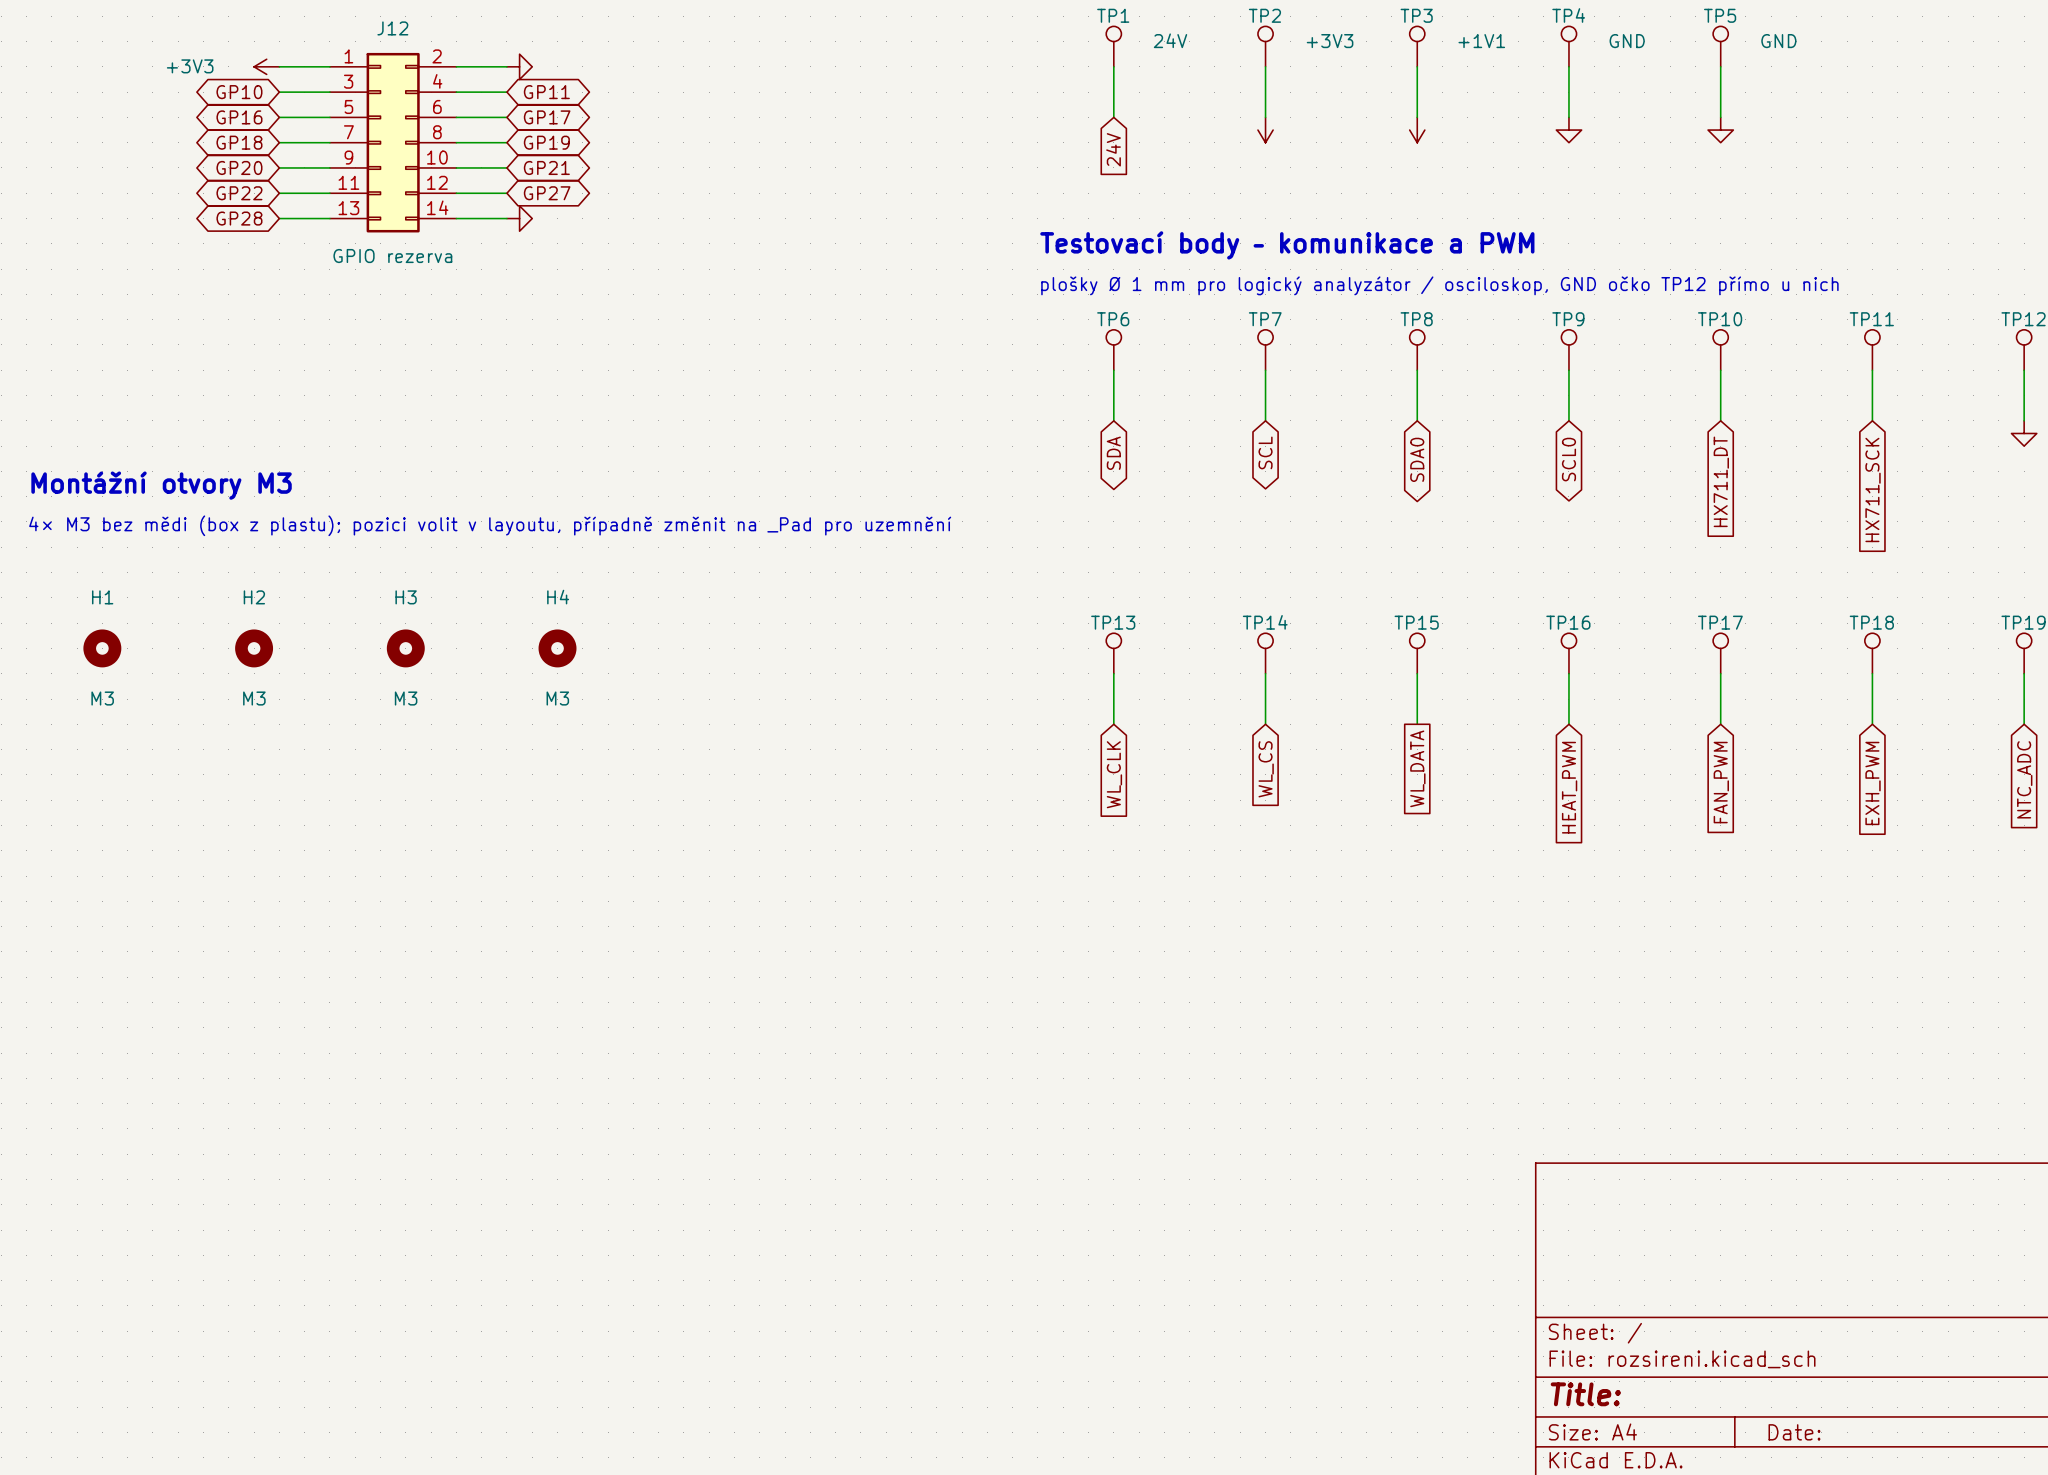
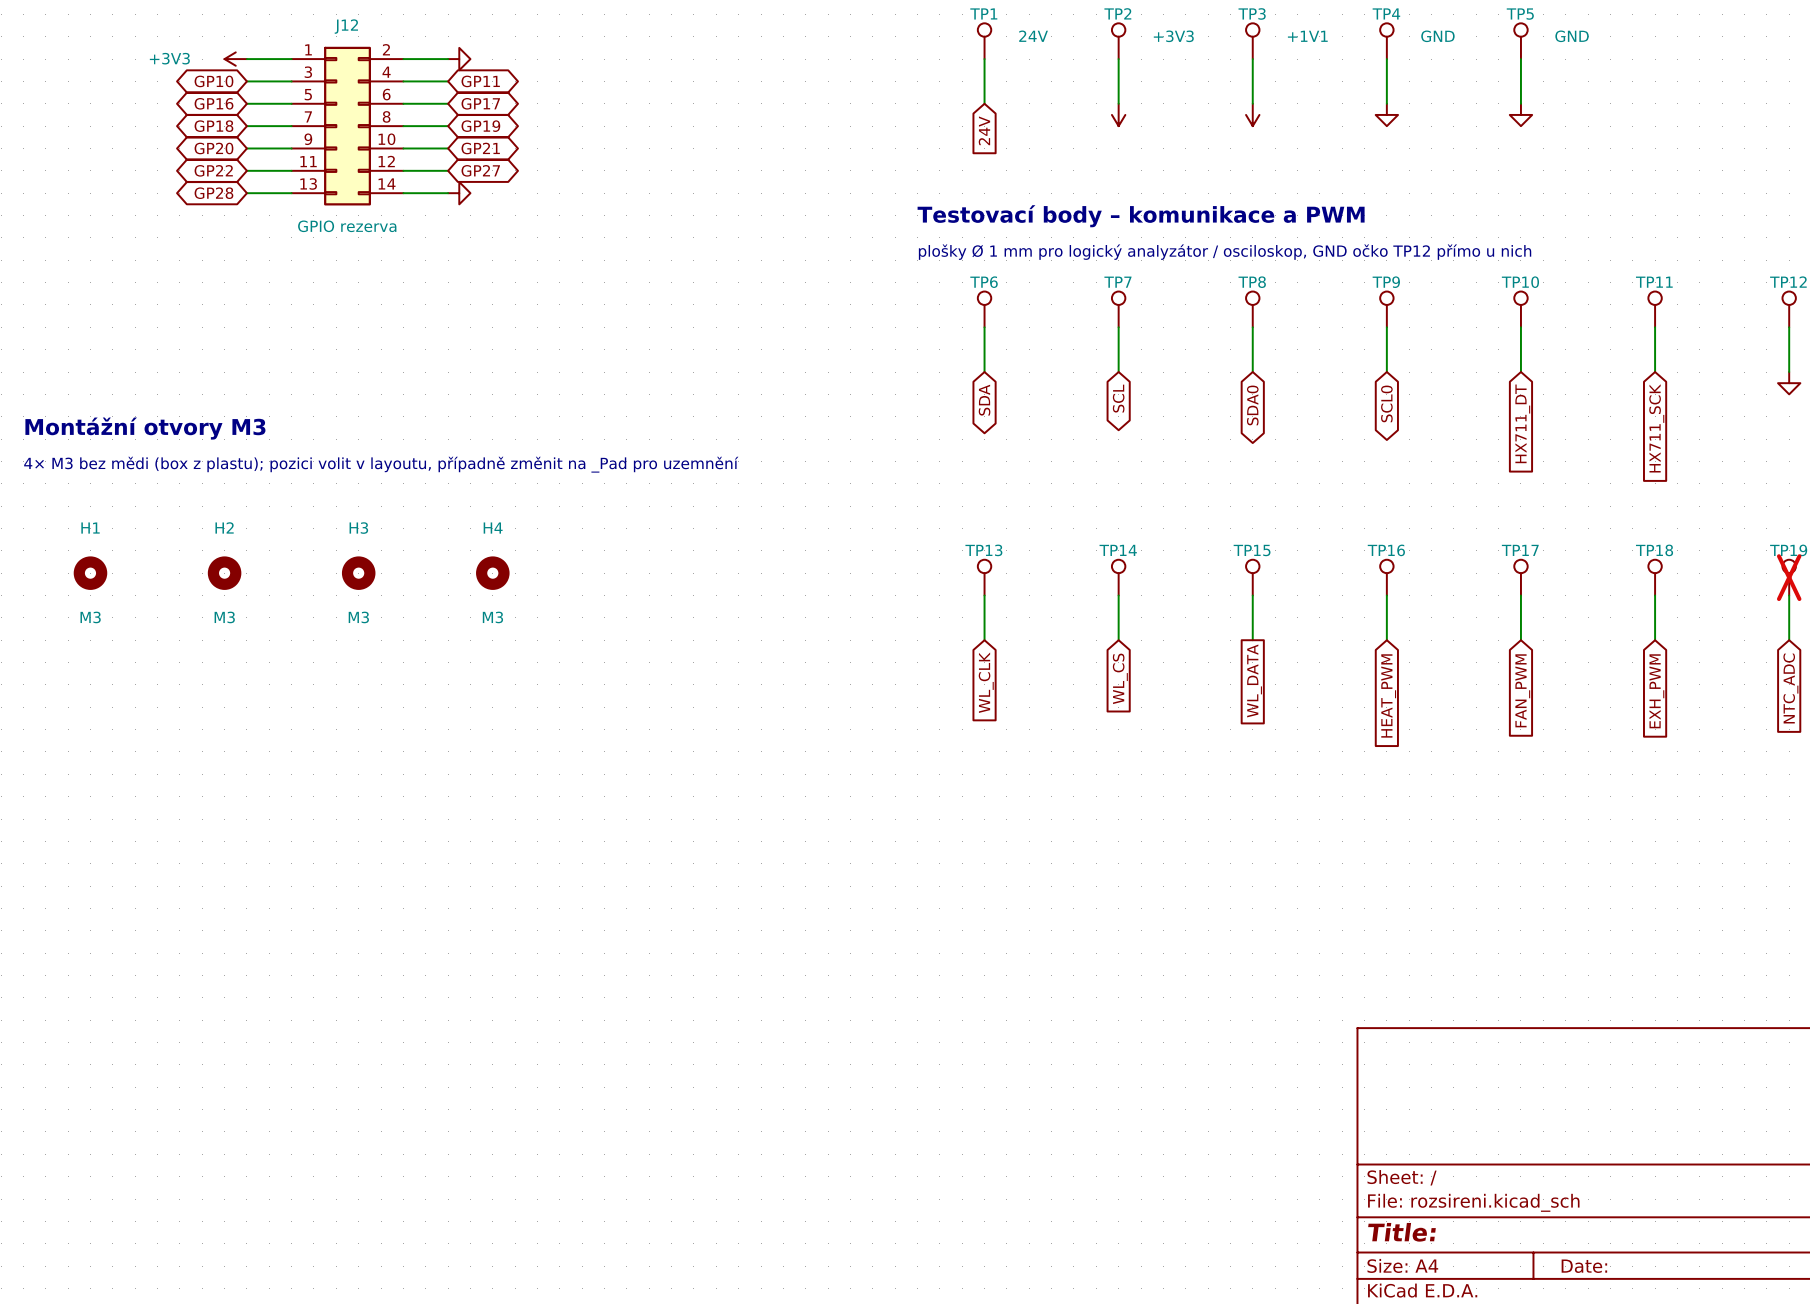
TP19 do-not-place cross: none -> (1789, 577)

